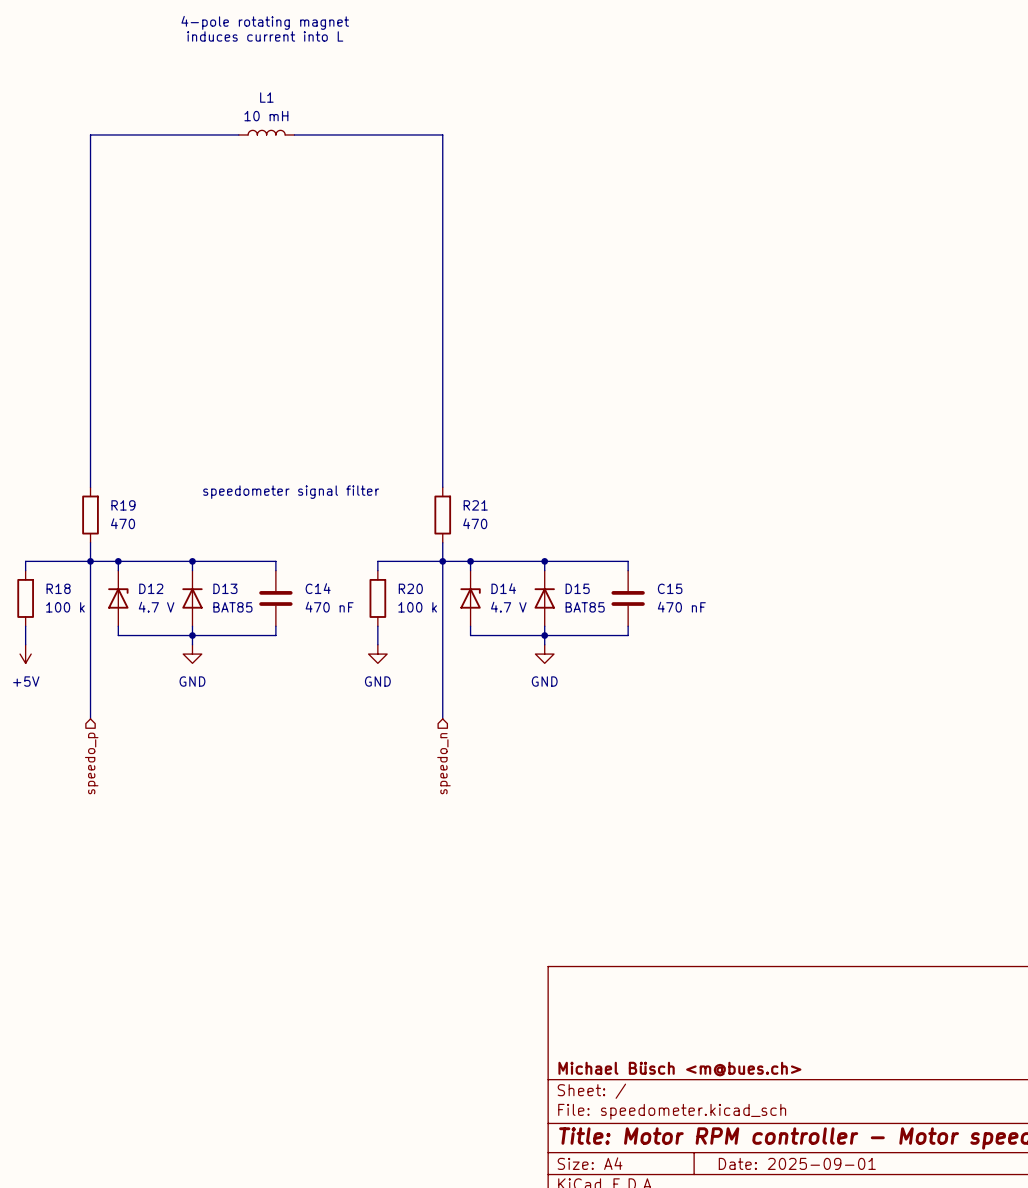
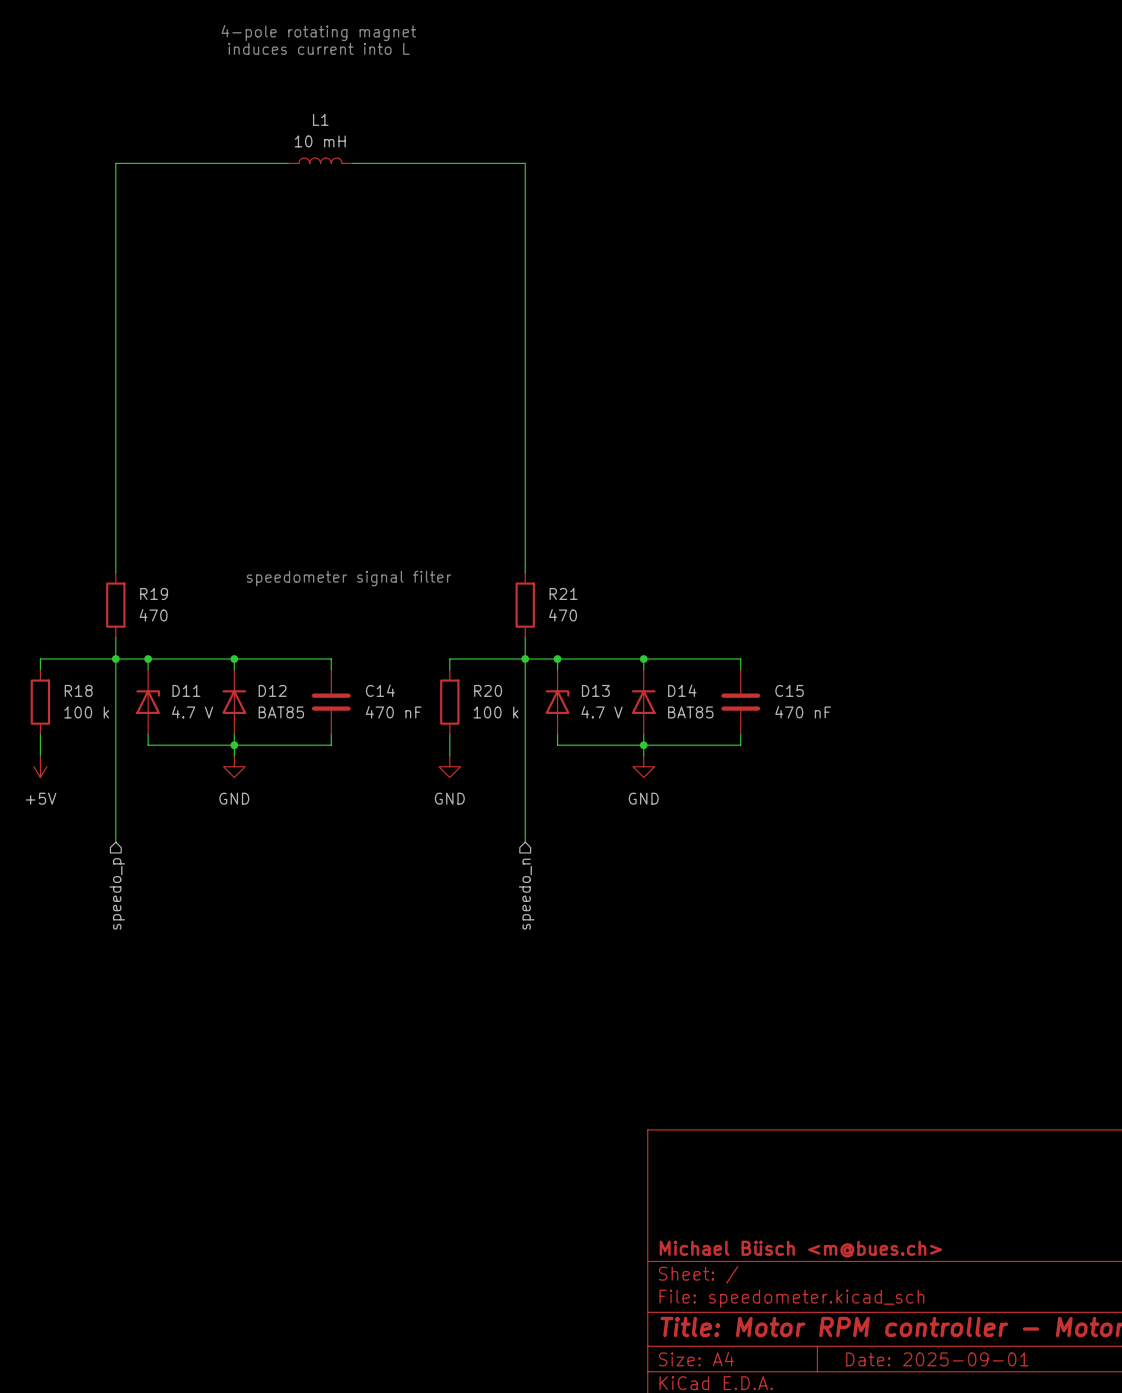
D12 name: D12 (151, 588) -> D11 (186, 690)
D13 name: D13 (225, 588) -> D12 (272, 690)
D14 name: D14 (503, 588) -> D13 (595, 690)
D15 name: D15 (577, 588) -> D14 (682, 690)

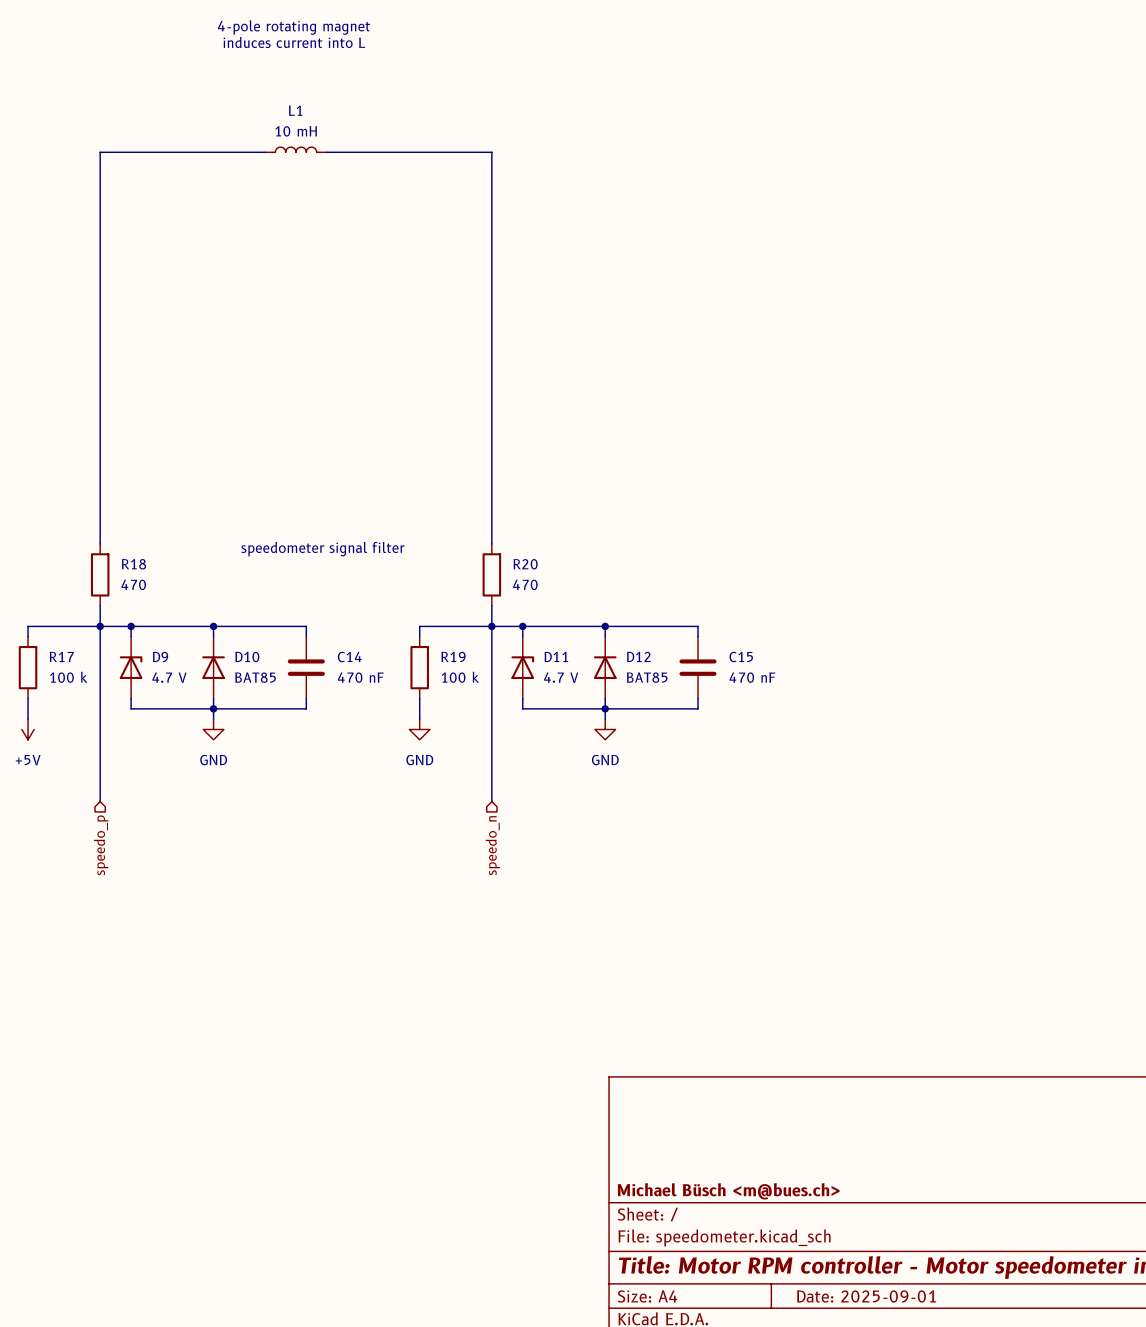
R19 name: R19 (154, 593) -> R18 (133, 564)
R21 name: R21 (563, 593) -> R20 (525, 564)
R18 name: R18 (78, 690) -> R17 (61, 656)
D11 name: D11 (186, 690) -> D9 (160, 657)
D12 name: D12 (272, 690) -> D10 (247, 657)
R20 name: R20 (488, 690) -> R19 (453, 657)
D13 name: D13 (595, 690) -> D11 (556, 656)
D14 name: D14 (682, 690) -> D12 (638, 656)

